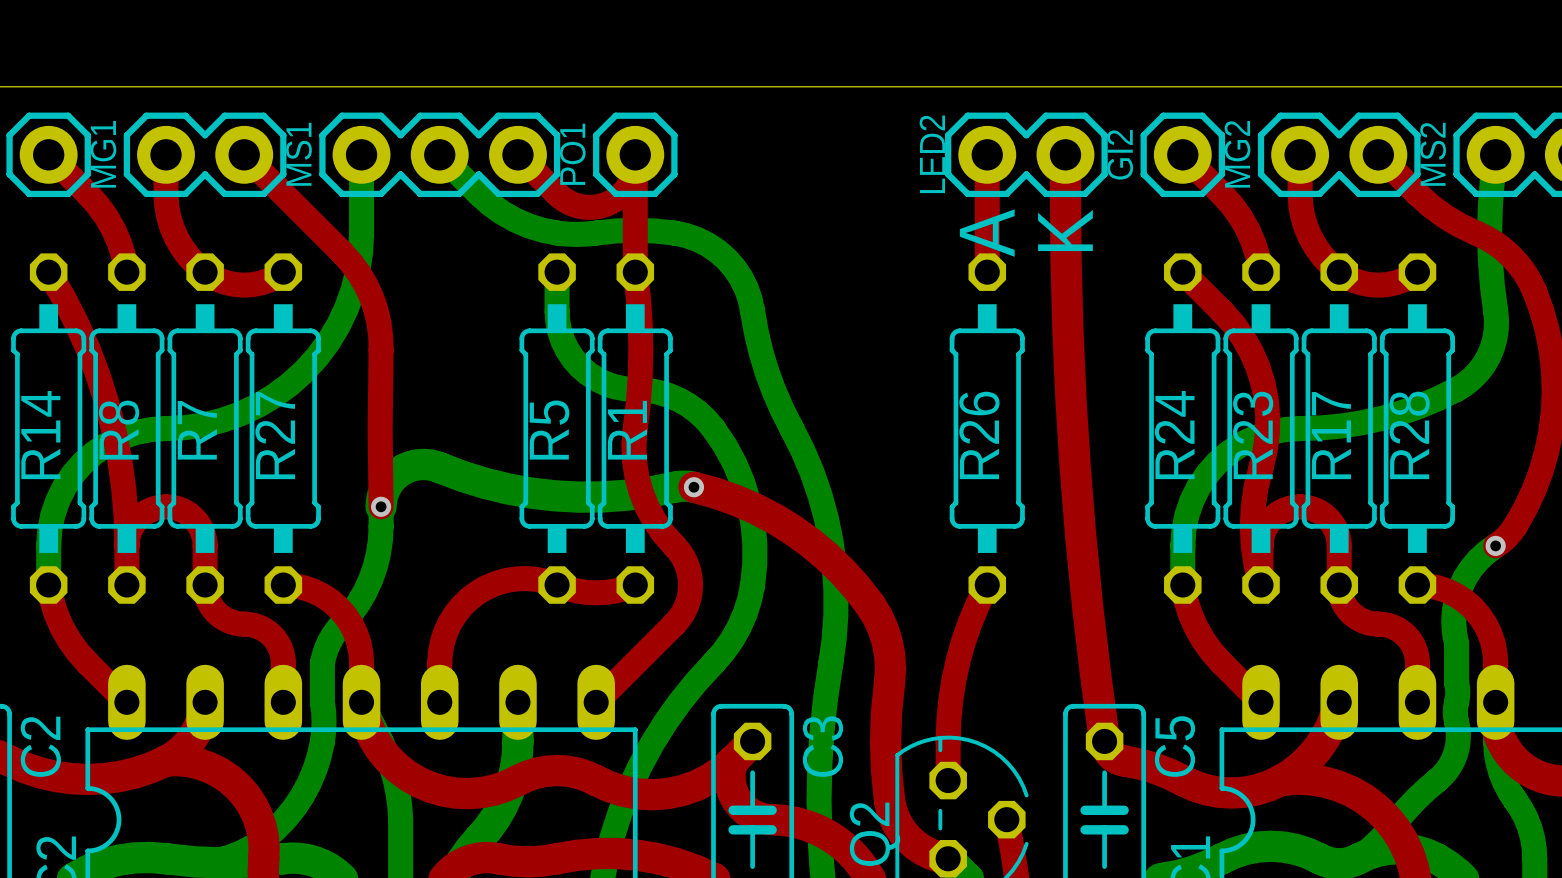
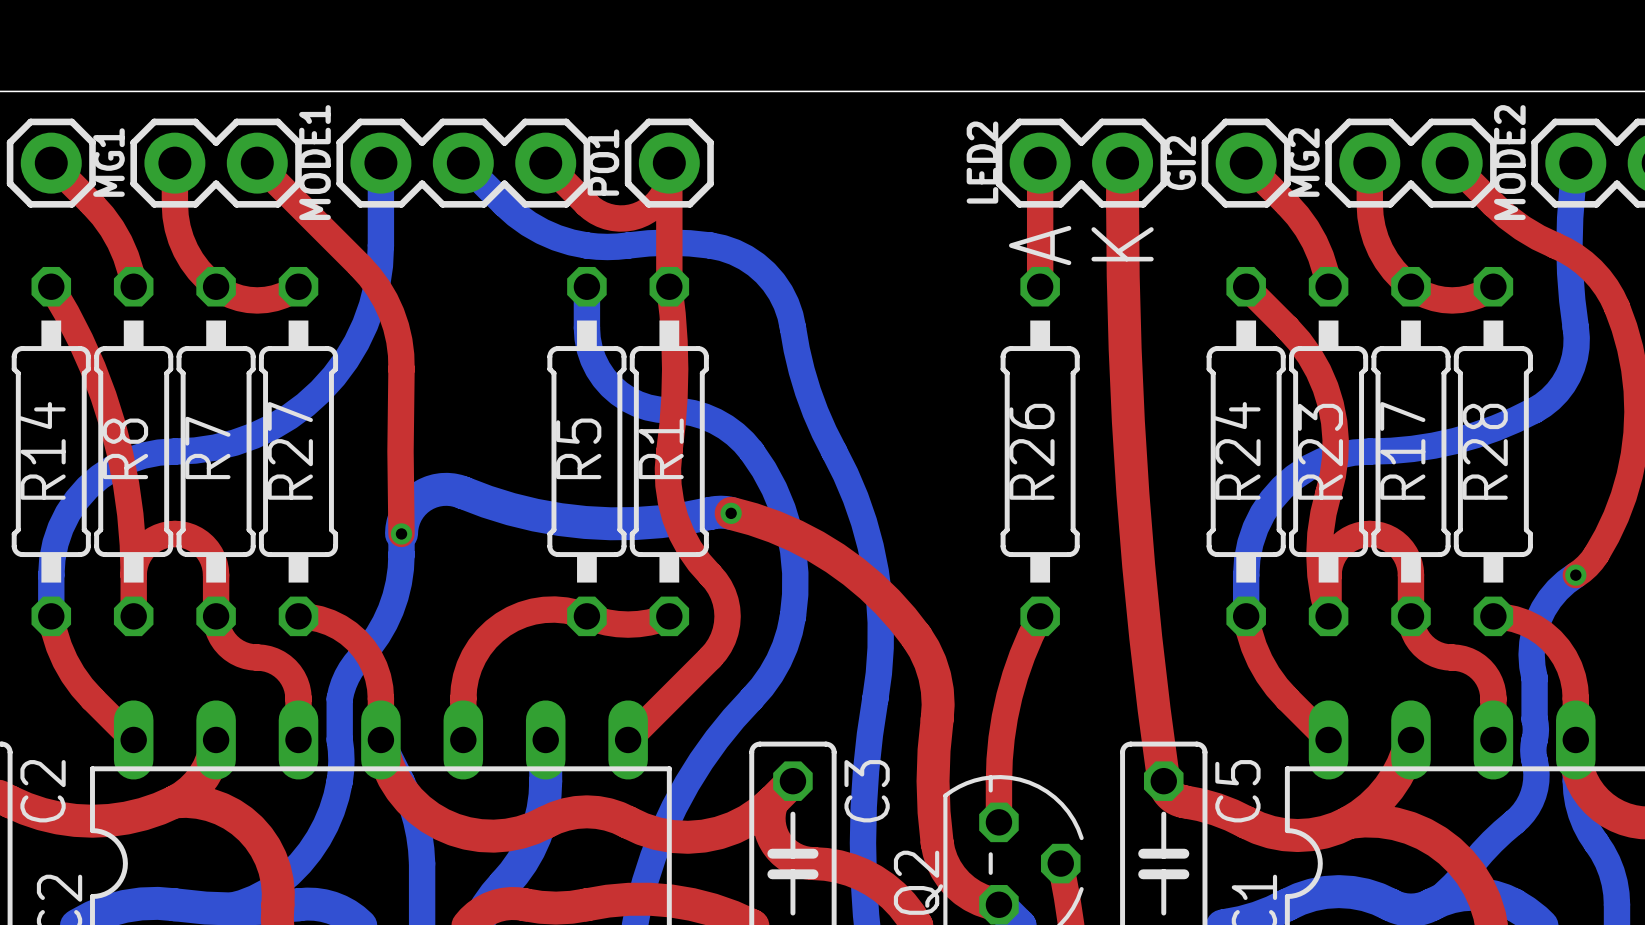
MS1 name: MS1 (298, 154) -> MODE1 (314, 162)
MS2 name: MS2 (1433, 154) -> MODE2 (1509, 162)

